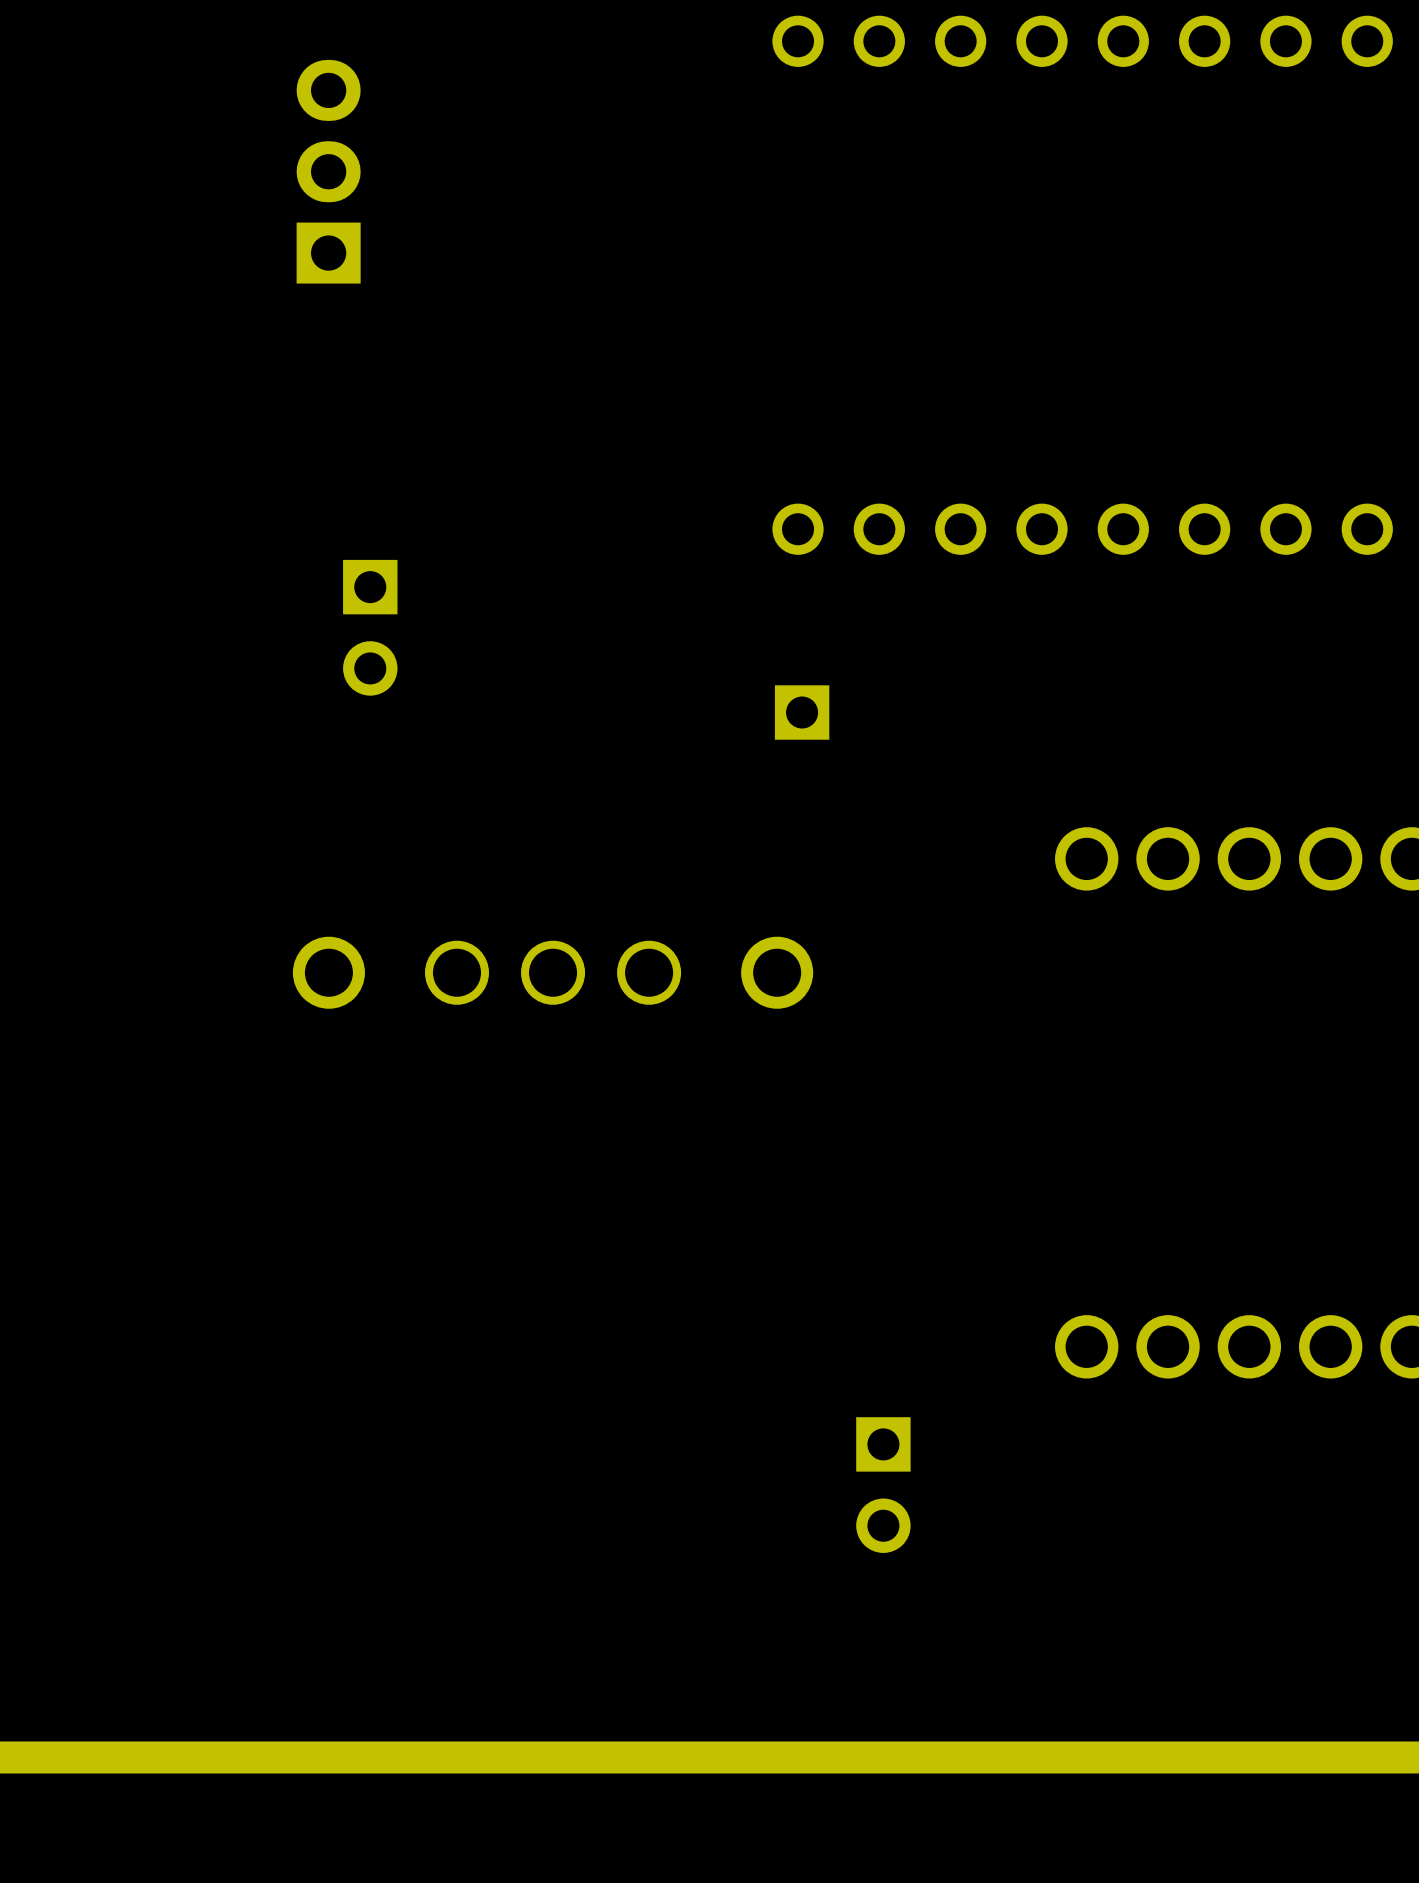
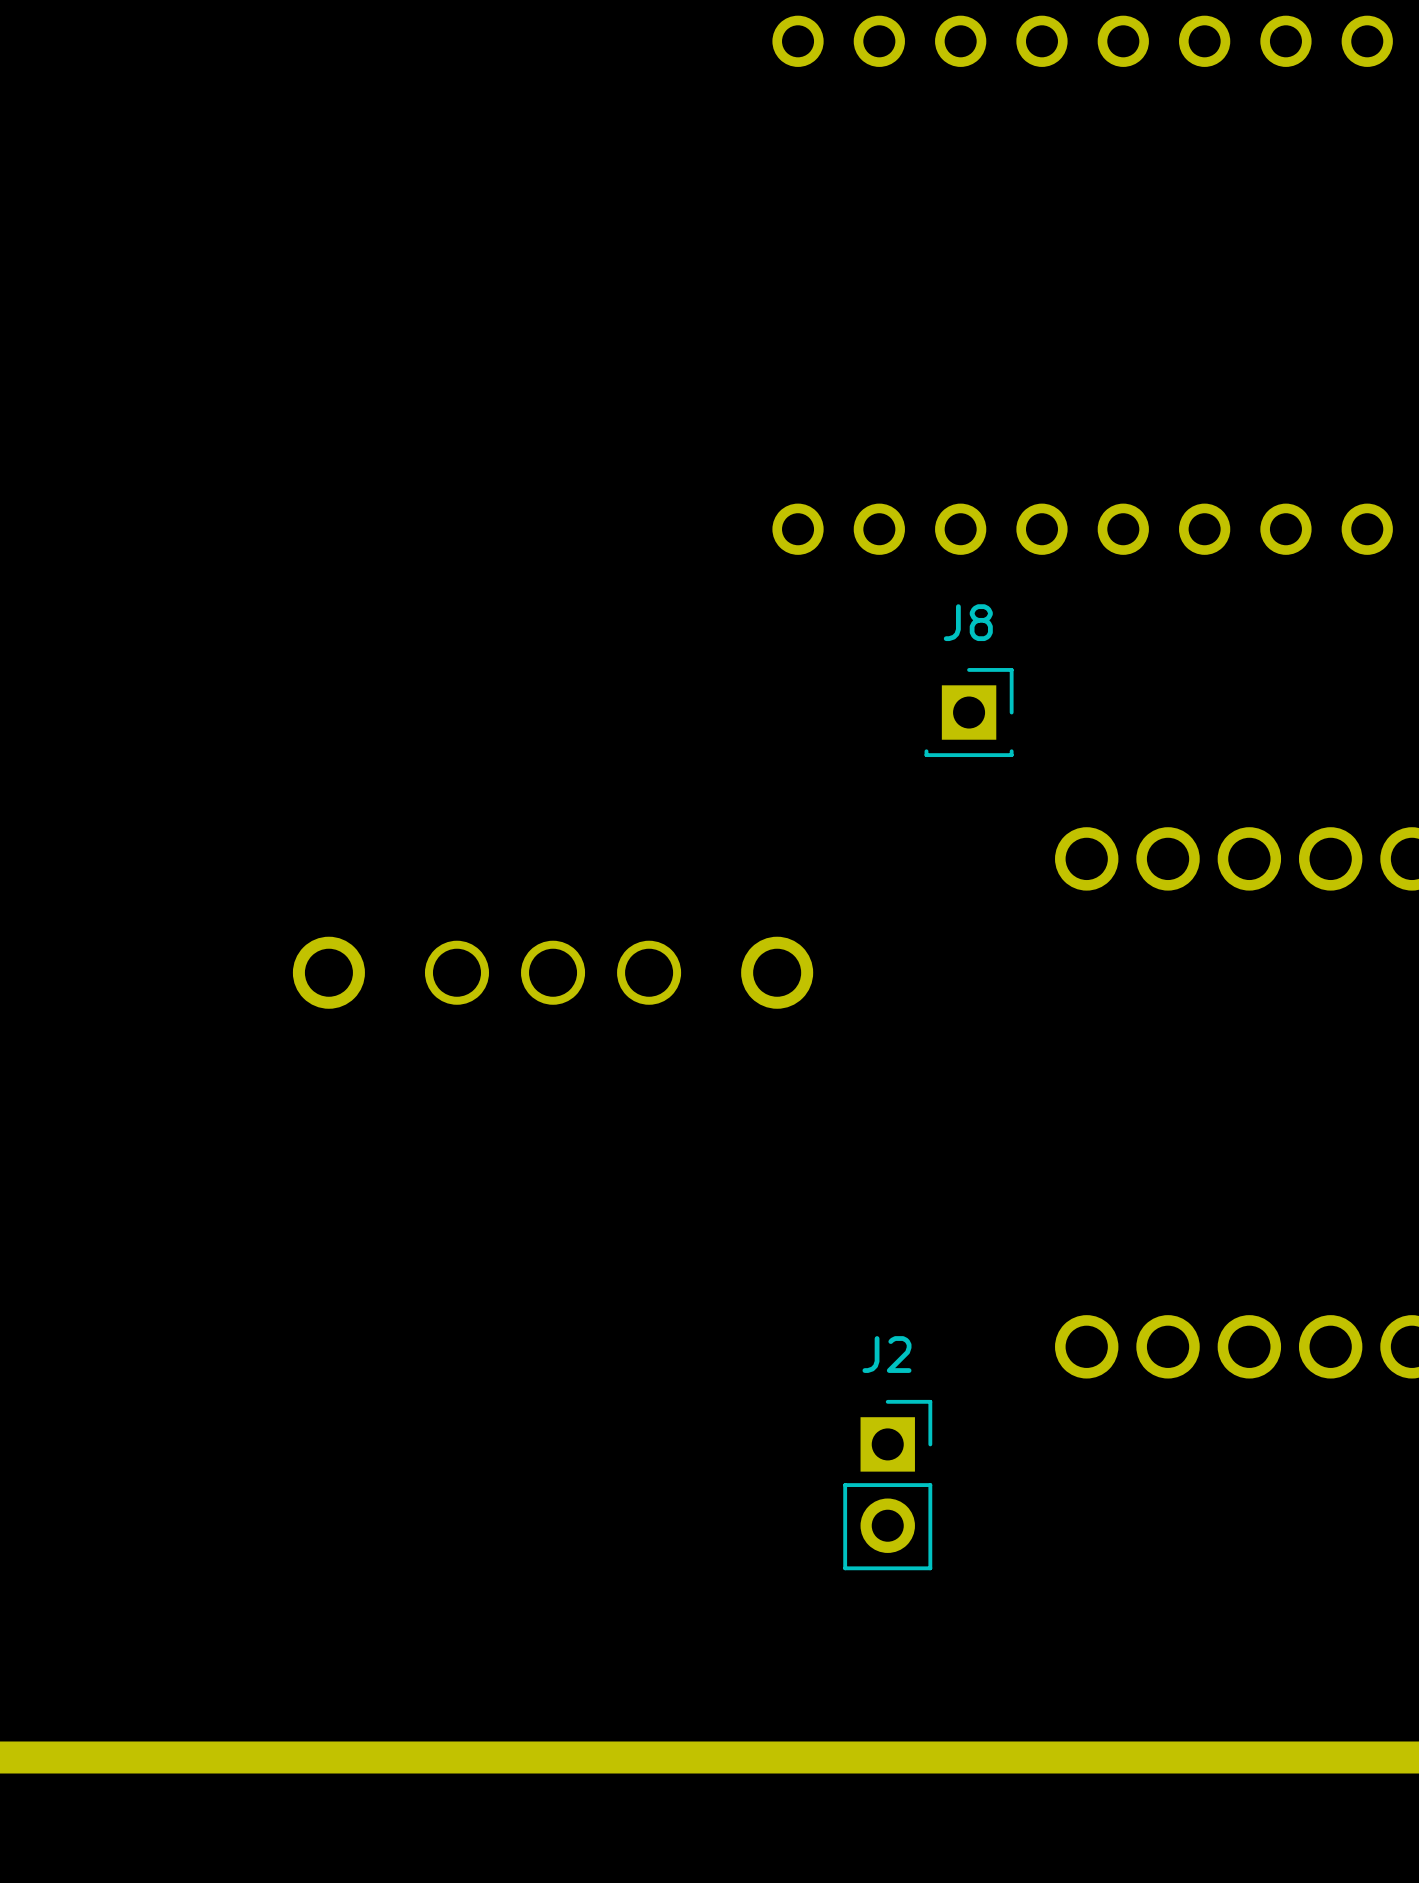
part: (328, 171) -> none
part: (370, 627) -> none
J8 side: bottom (802, 712) -> top (969, 712)
J2 side: bottom (883, 1485) -> top (887, 1485)

